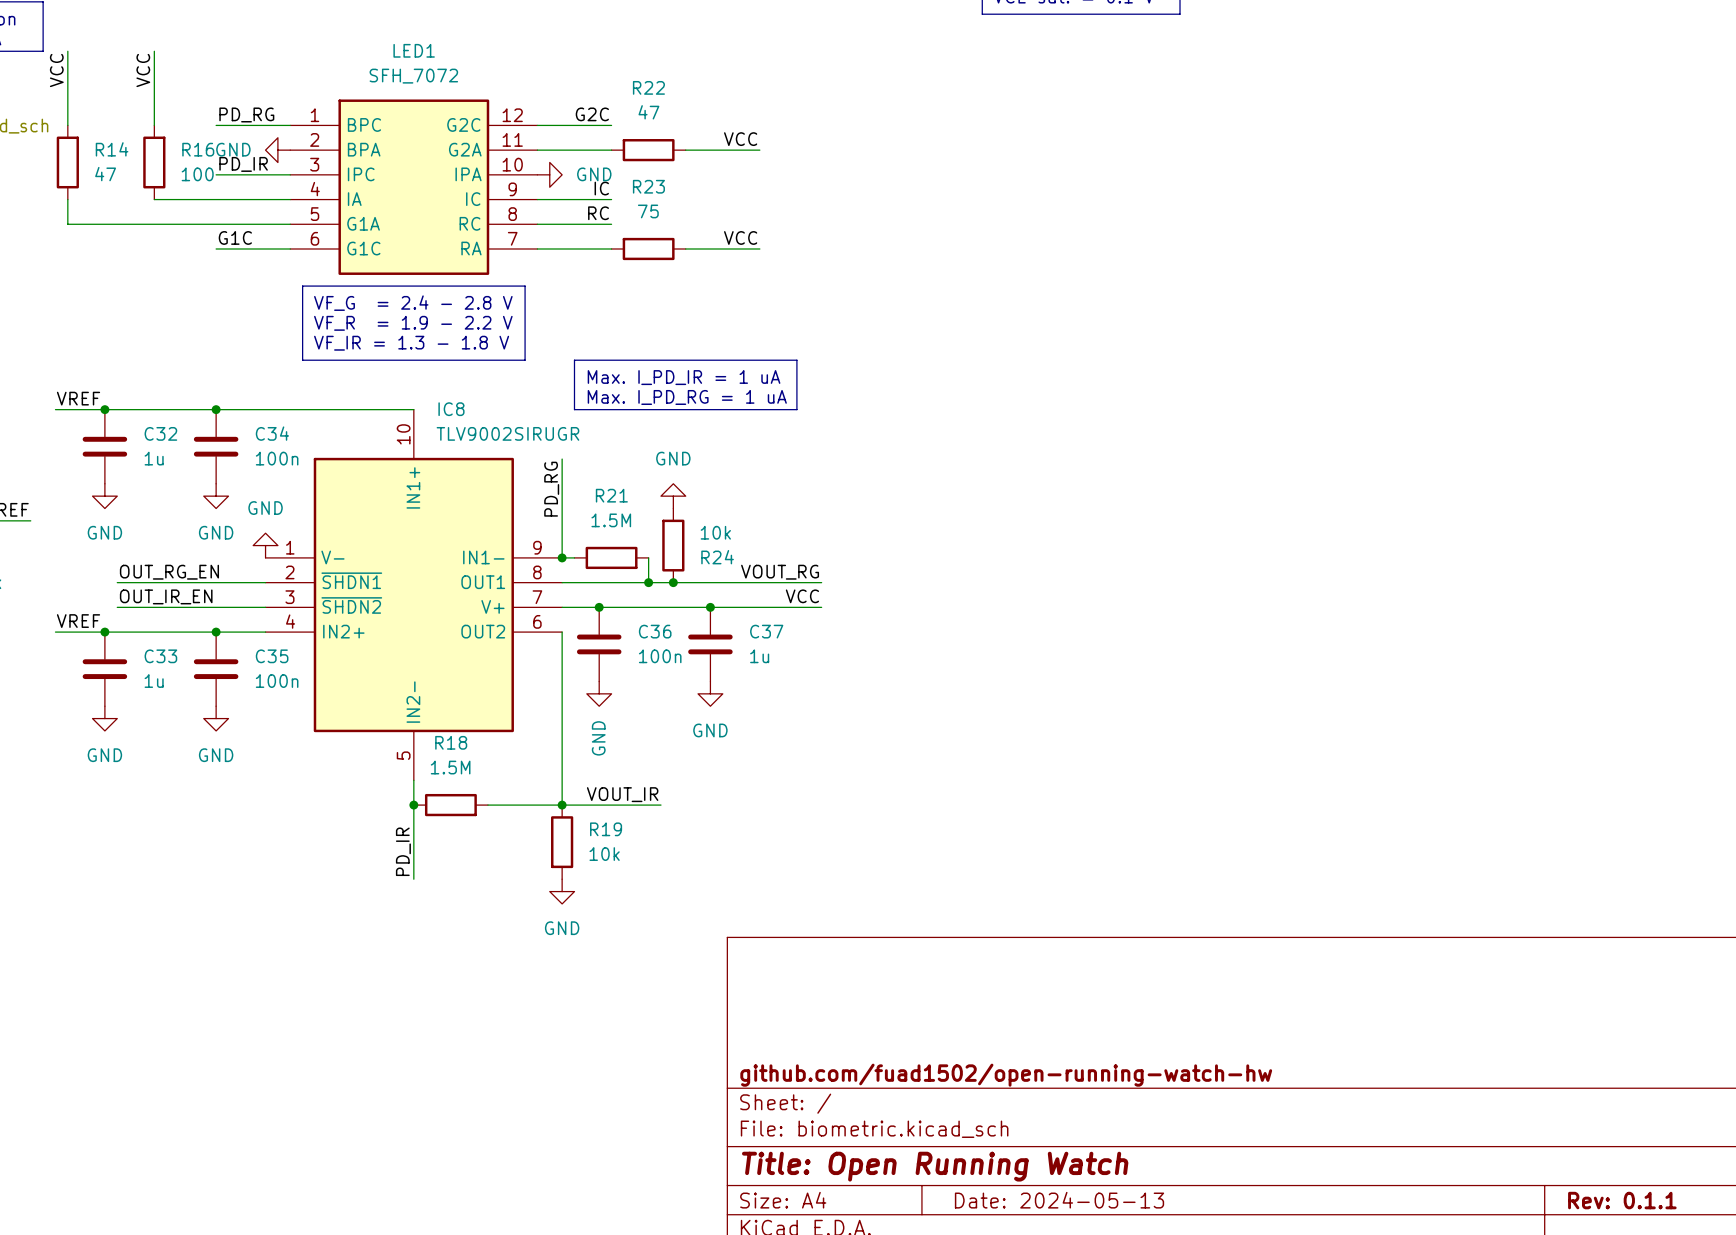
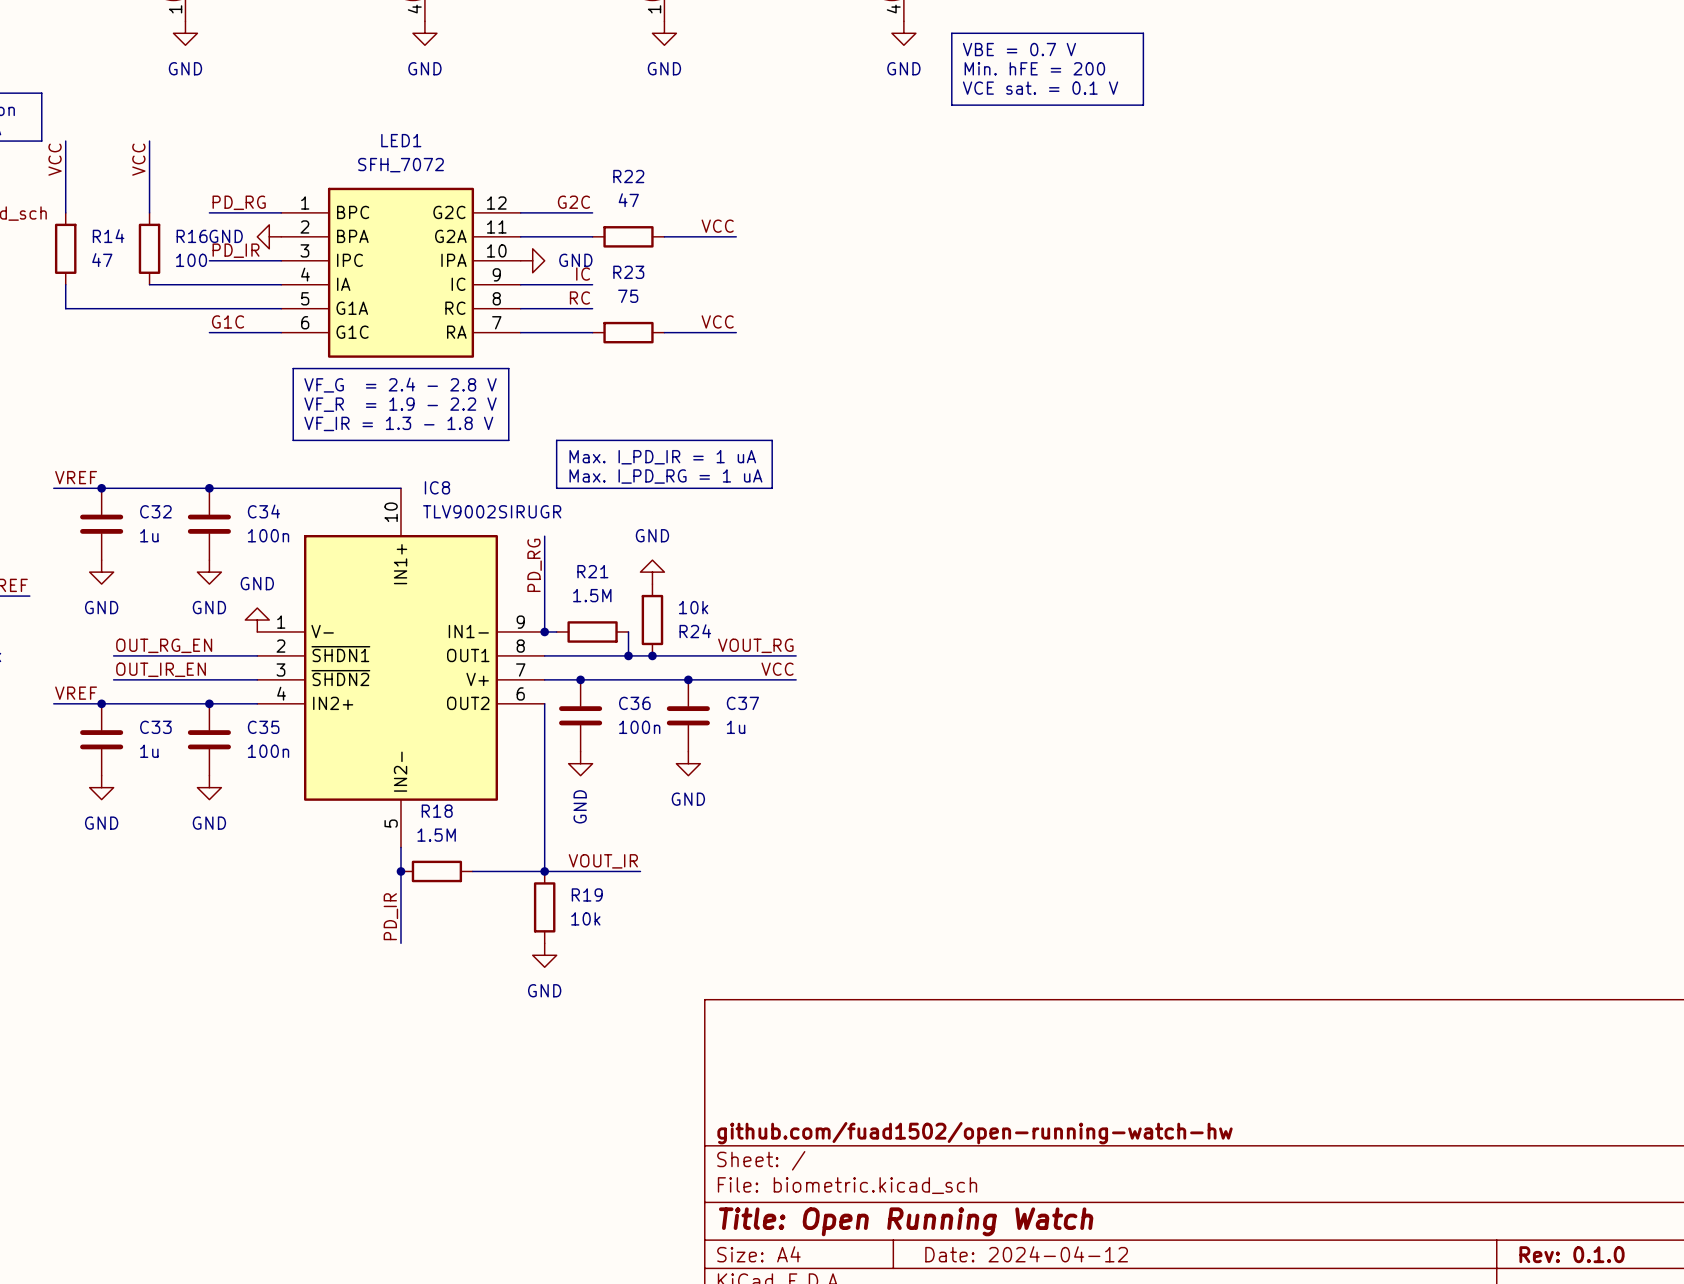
title block: Date: 2024-05-13 (1059, 1200) -> Date: 2024-04-12 (1026, 1254)
title block: Rev: 0.1.1 (1622, 1200) -> Rev: 0.1.0 (1572, 1254)

